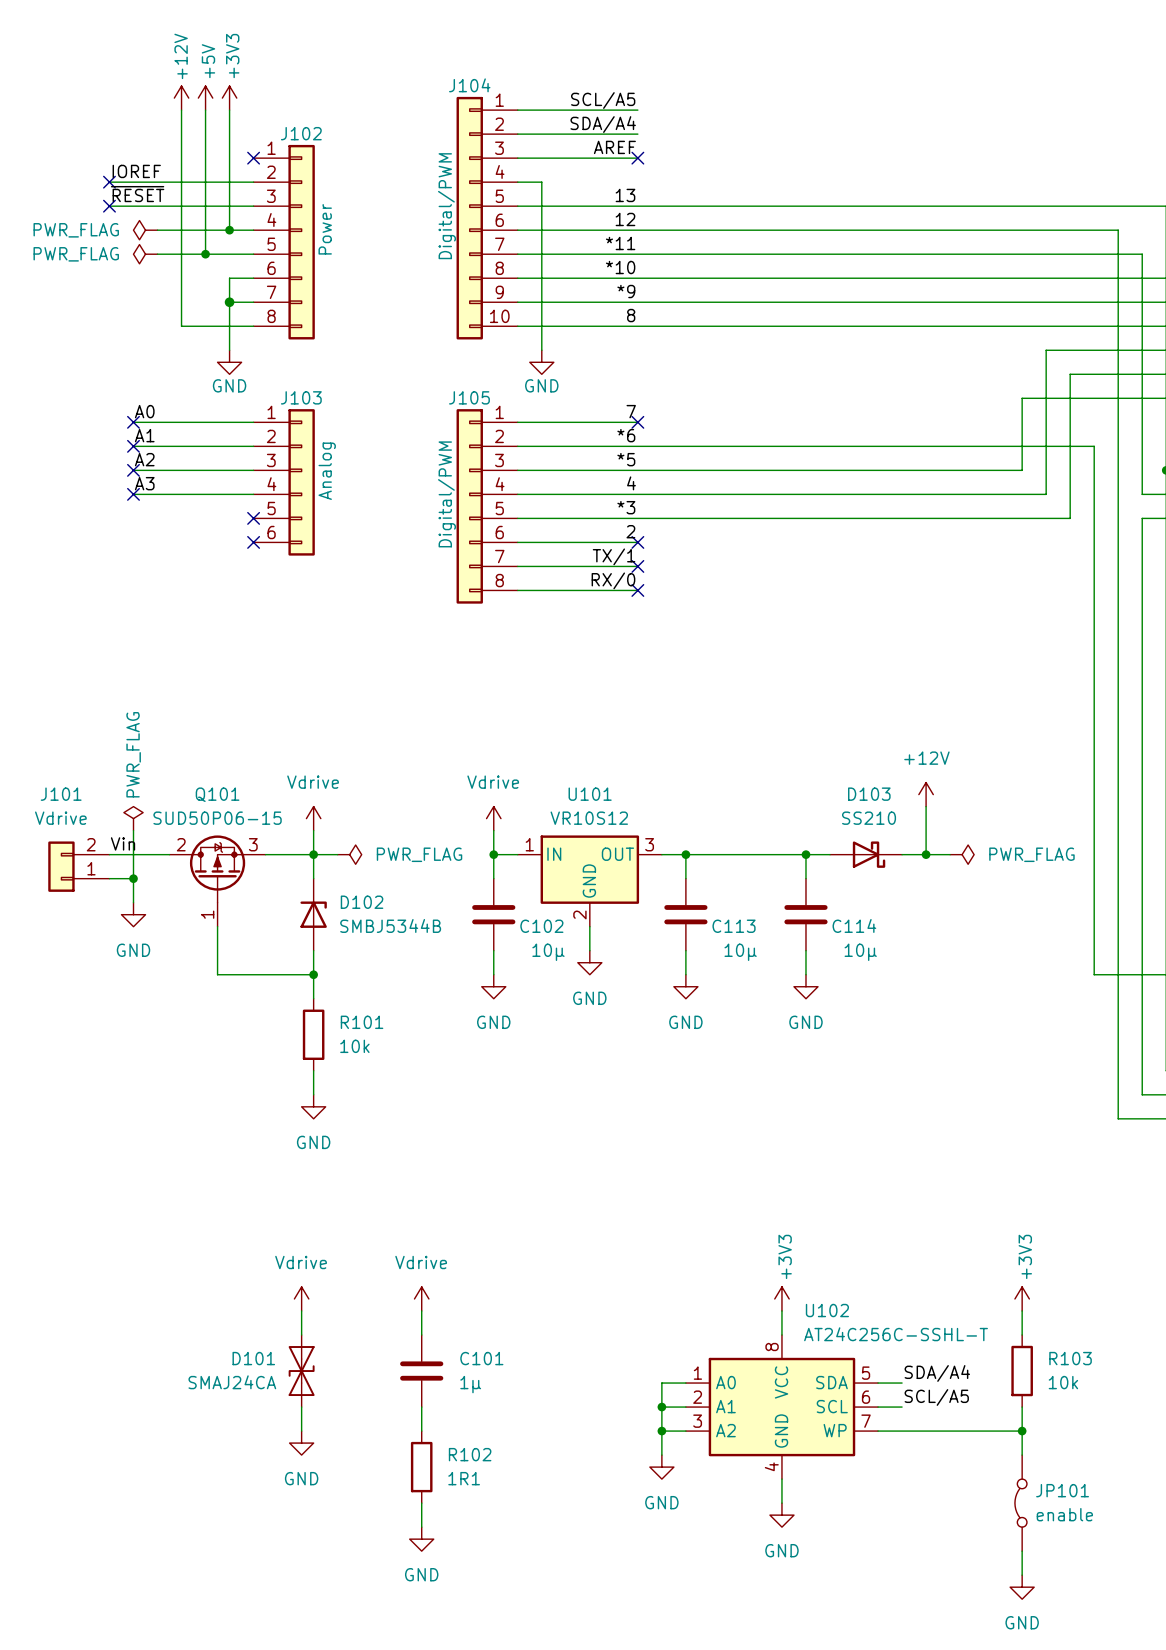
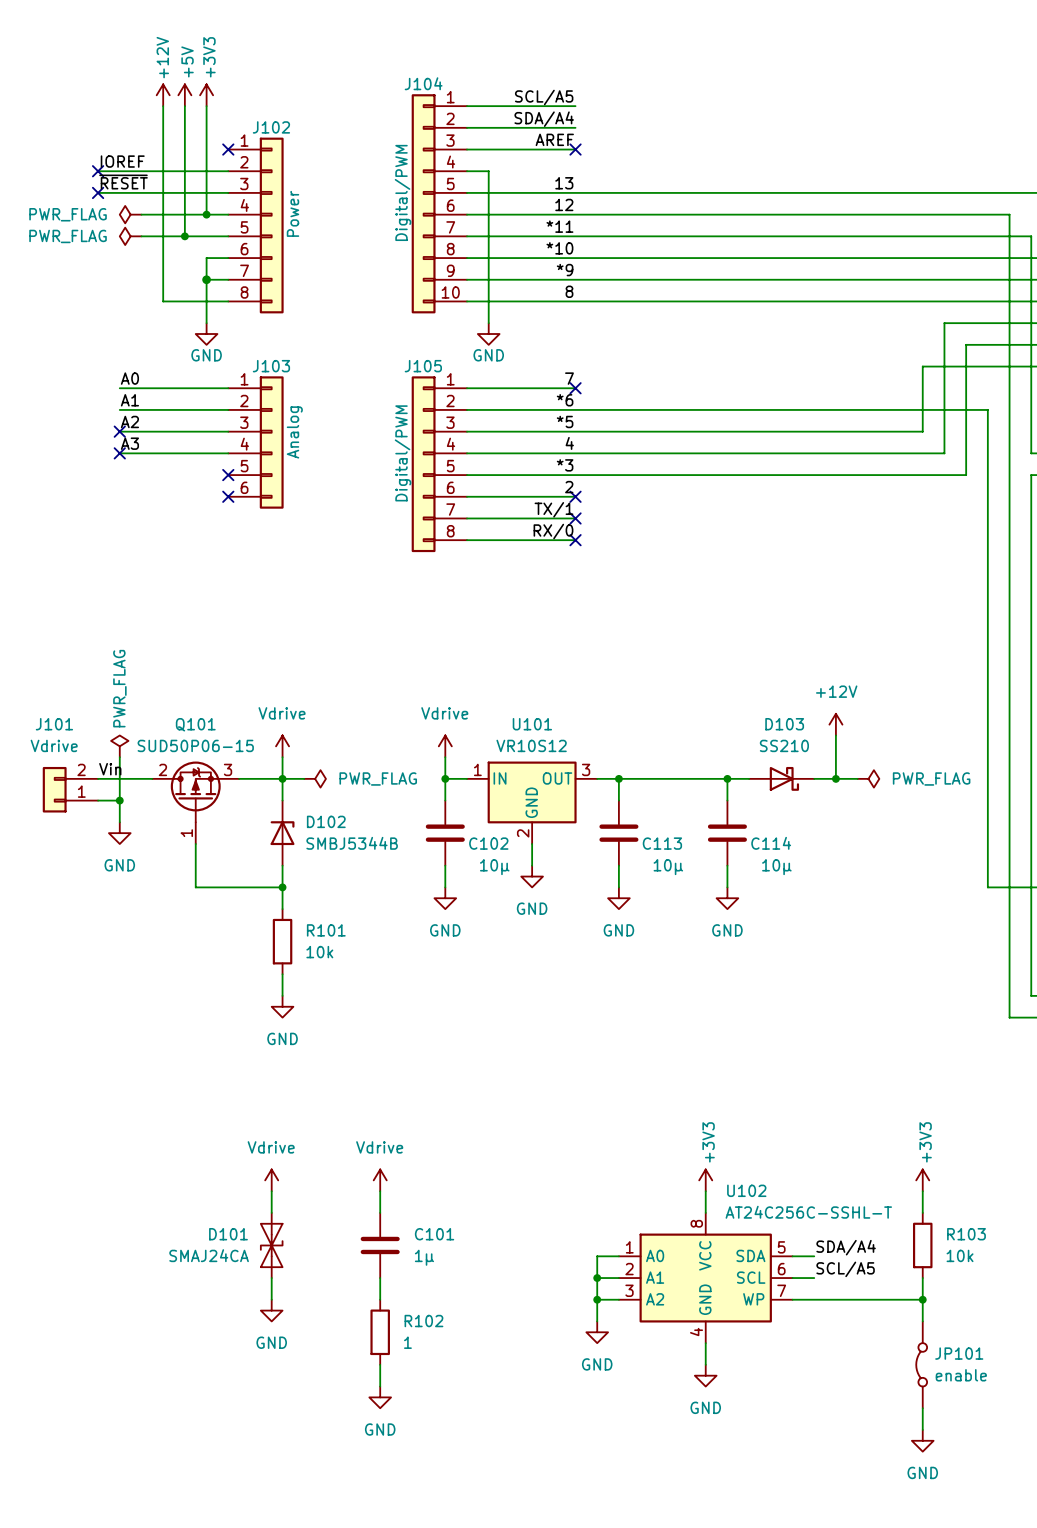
no-connect mark: (133, 422) -> none
no-connect mark: (133, 446) -> none
R102 value: 1R1 (464, 1478) -> 1 (407, 1342)

